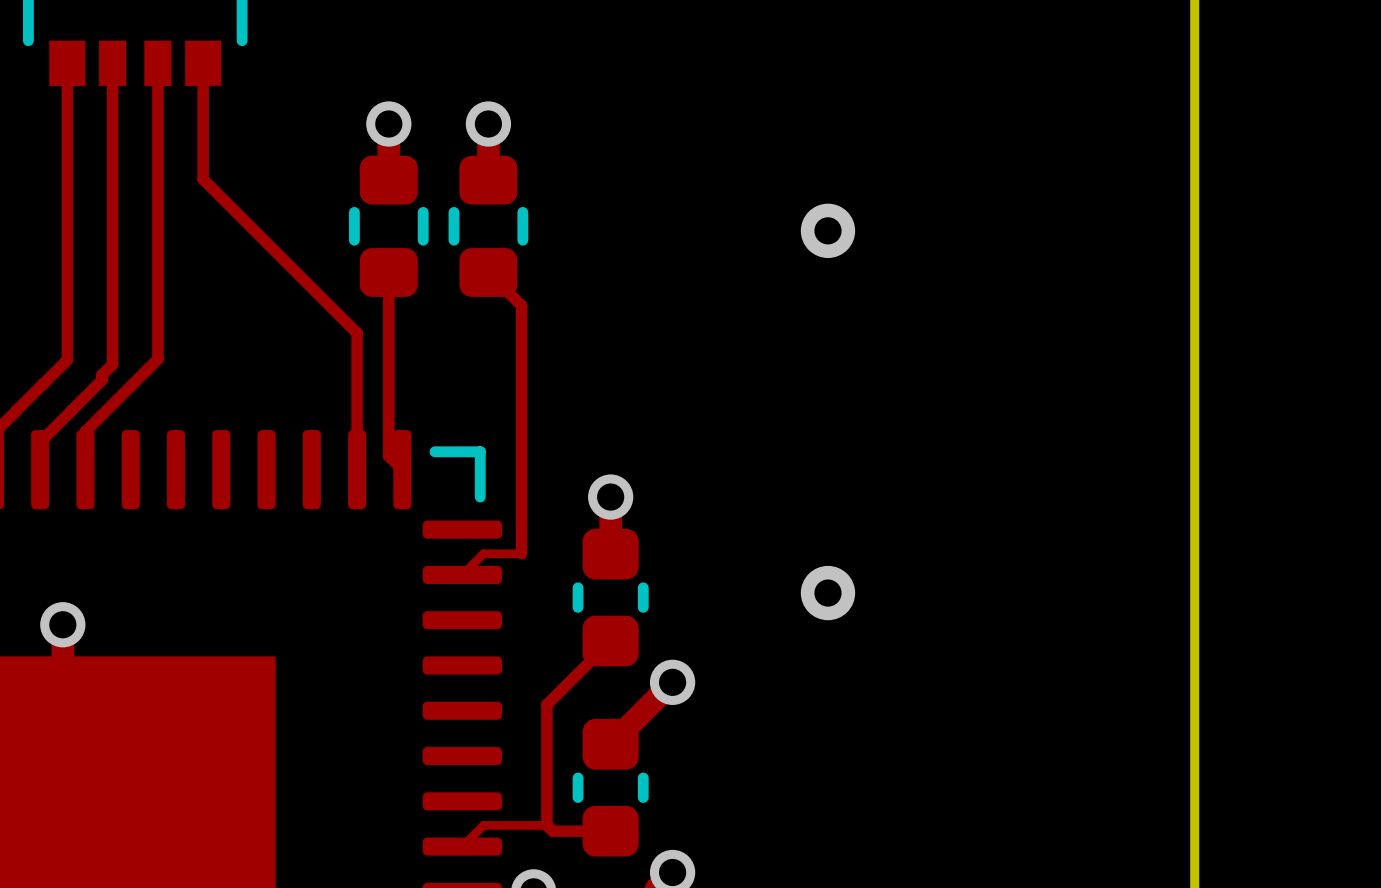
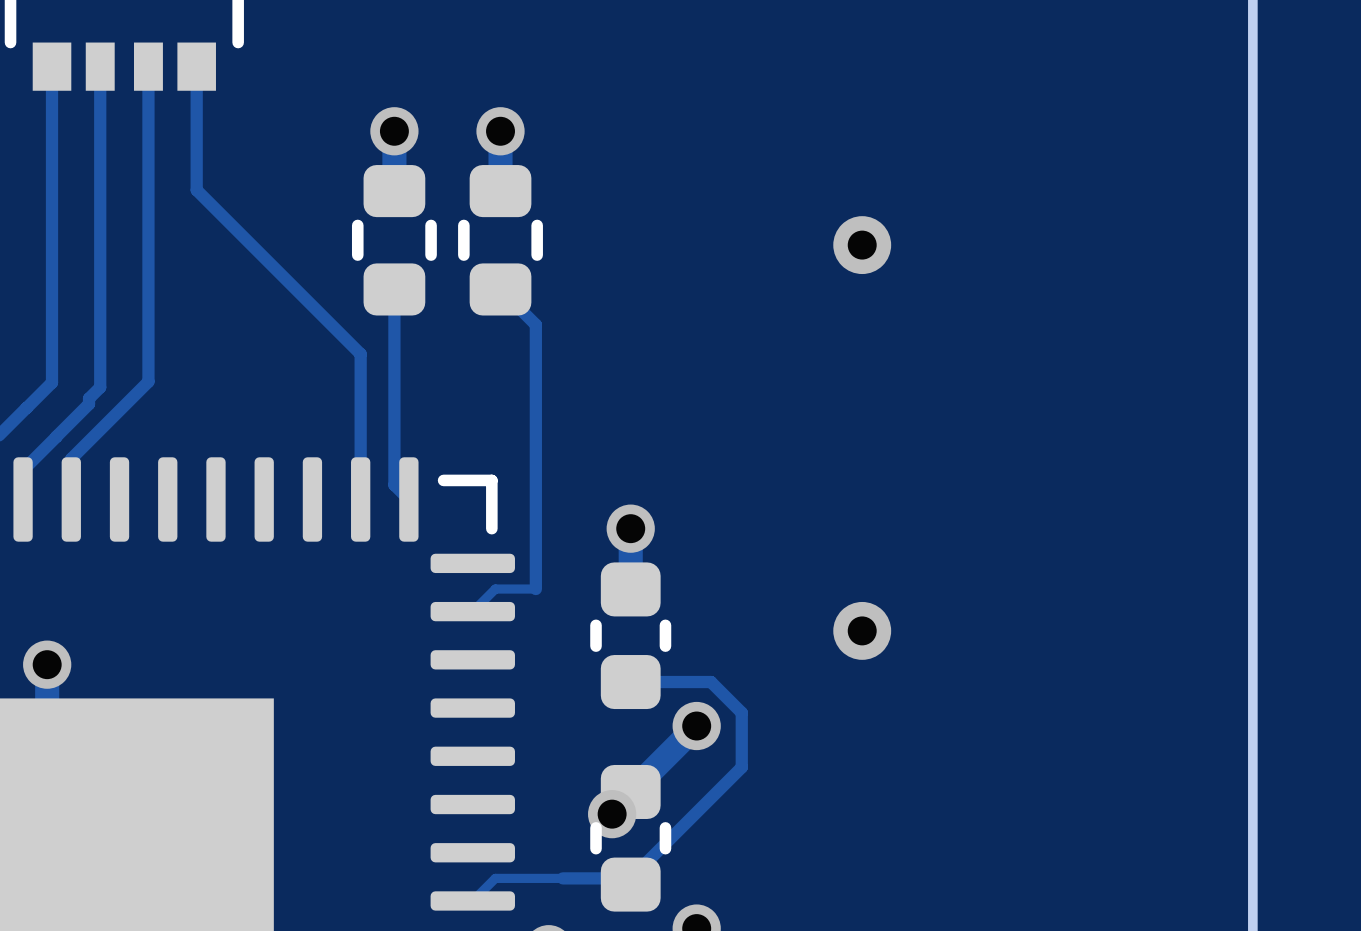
track: (610, 641) (546, 704) (546, 825) (552, 831) (610, 831) -> (630, 682) (711, 682) (741, 712) (741, 767) (630, 878)
via: none -> (612, 814)
track: none -> (562, 878) (630, 878)

